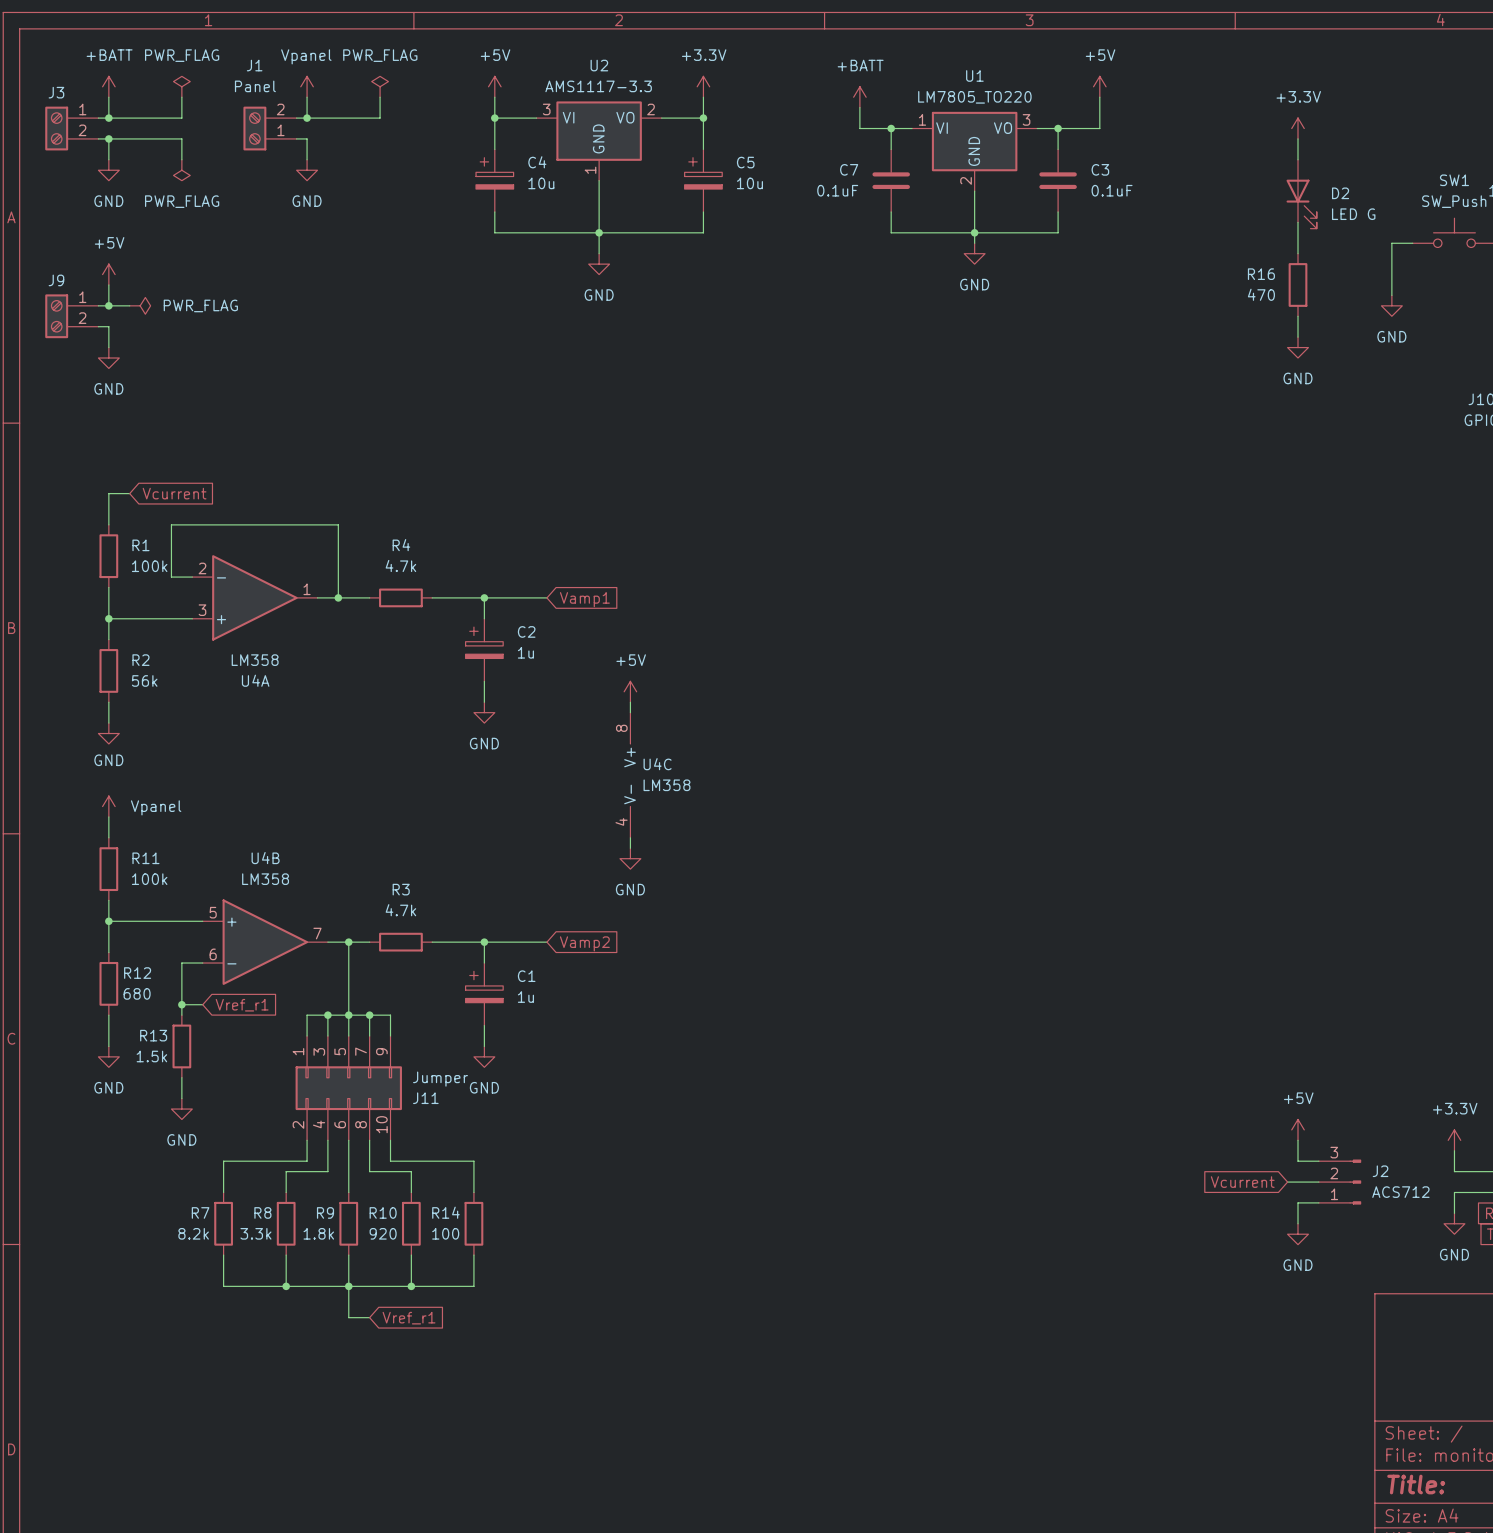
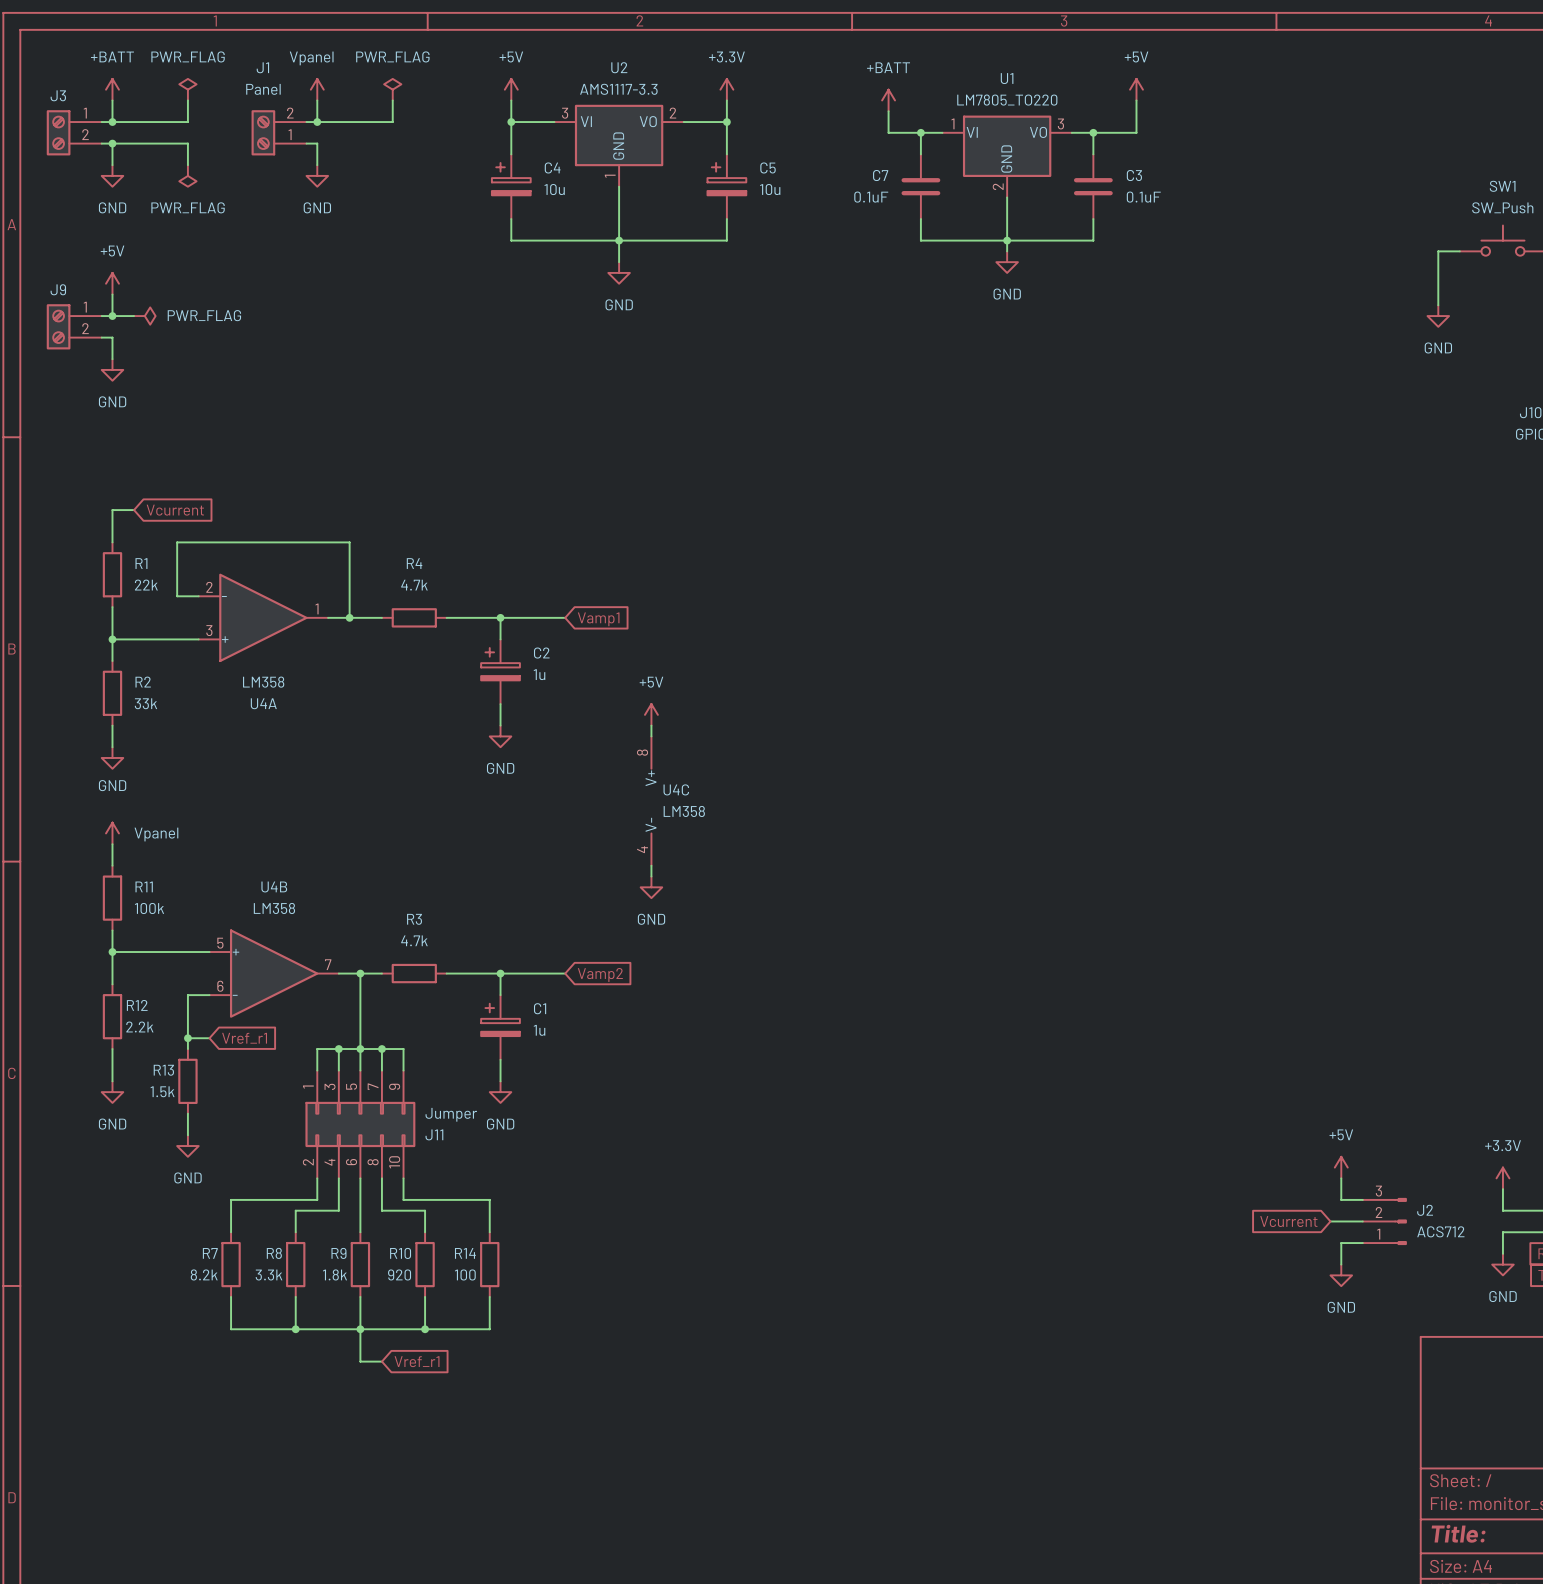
power symbol: +3.3V (1298, 128) -> none
wire: (1298, 138) (1298, 159) -> none
D2: LED G (1301, 194) -> none
wire: (1298, 222) (1298, 253) -> none
R16: 470 (1298, 284) -> none
wire: (1298, 316) (1298, 337) -> none
power symbol: GND (1298, 347) -> none
R1 value: 100k (149, 566) -> 22k (146, 585)
R2 value: 56k (144, 680) -> 33k (145, 703)
R12 value: 680 (137, 993) -> 2.2k (139, 1027)

